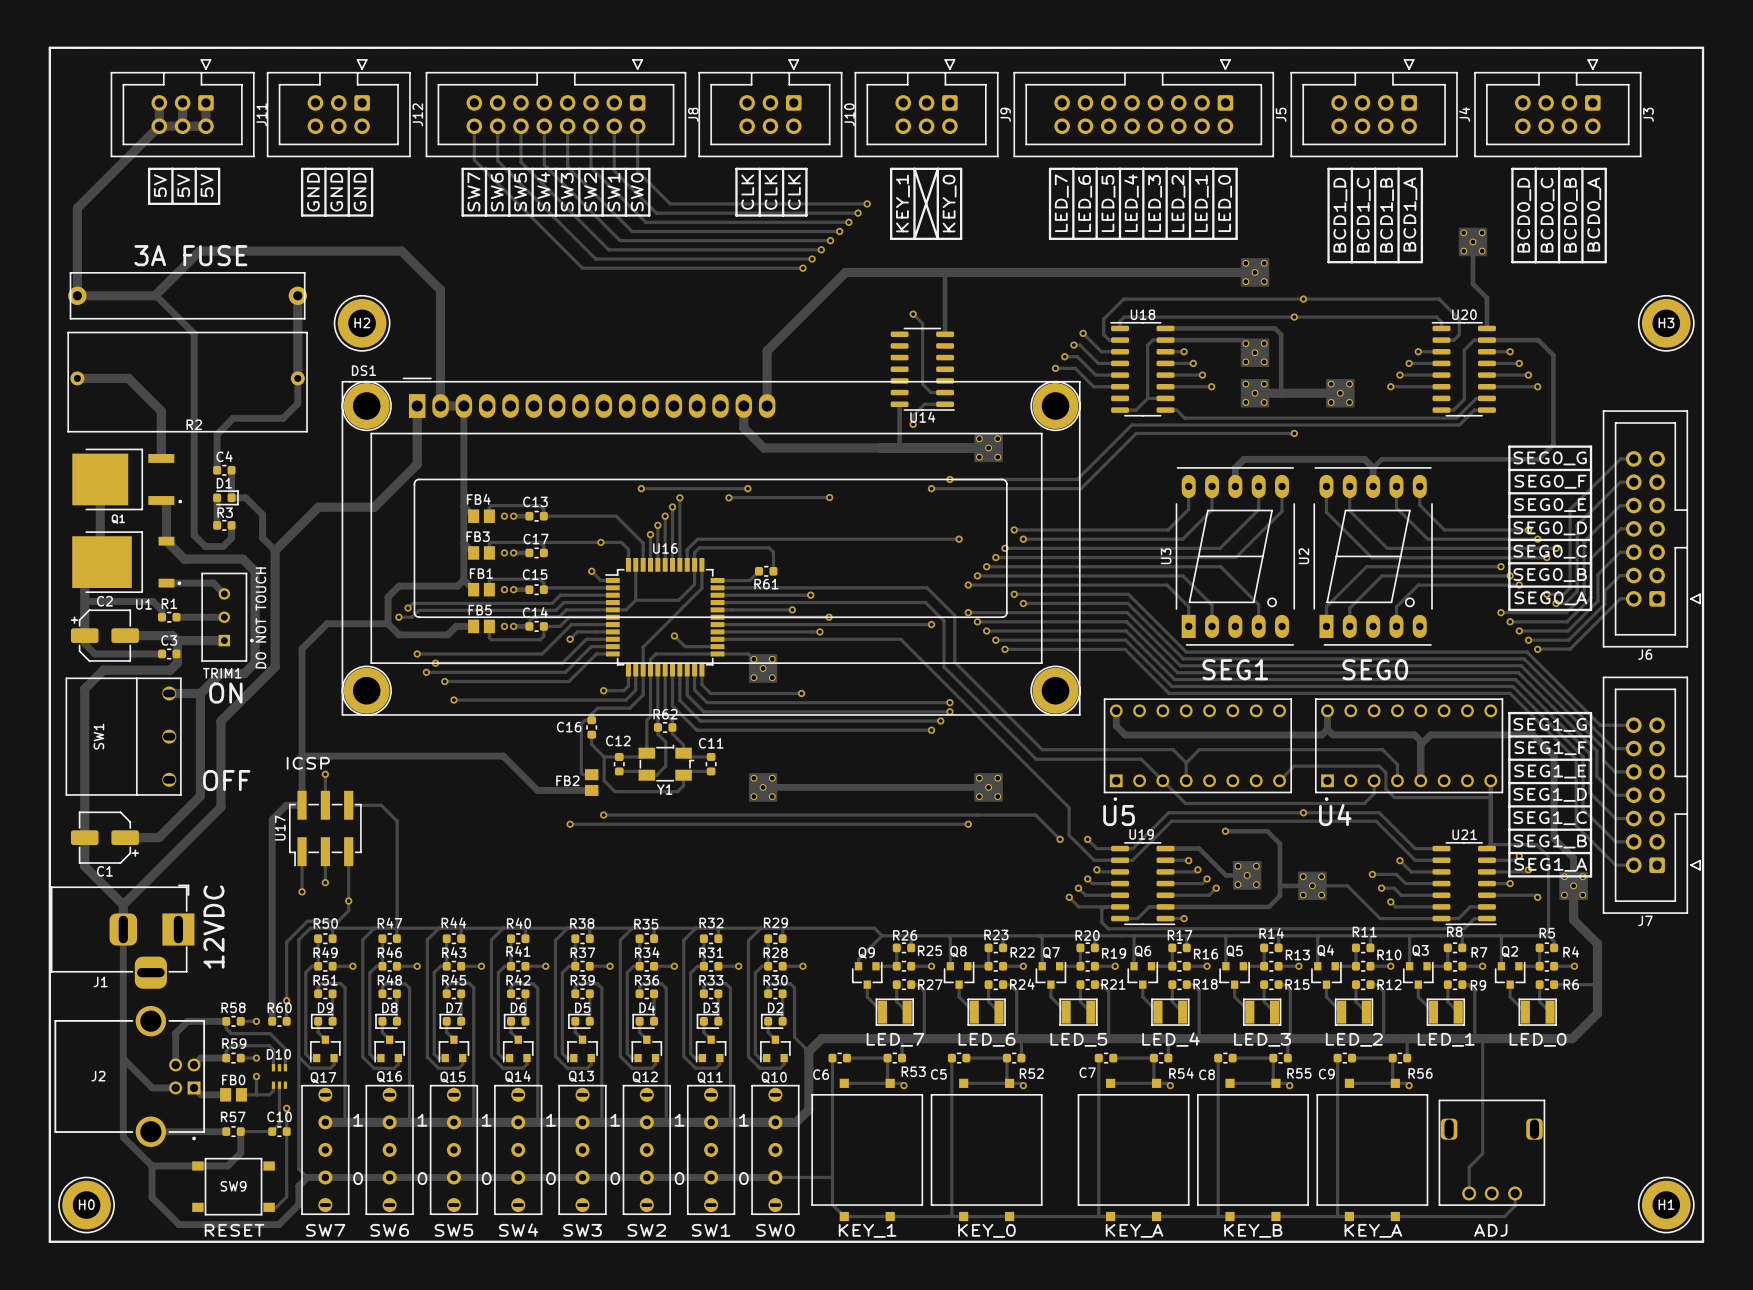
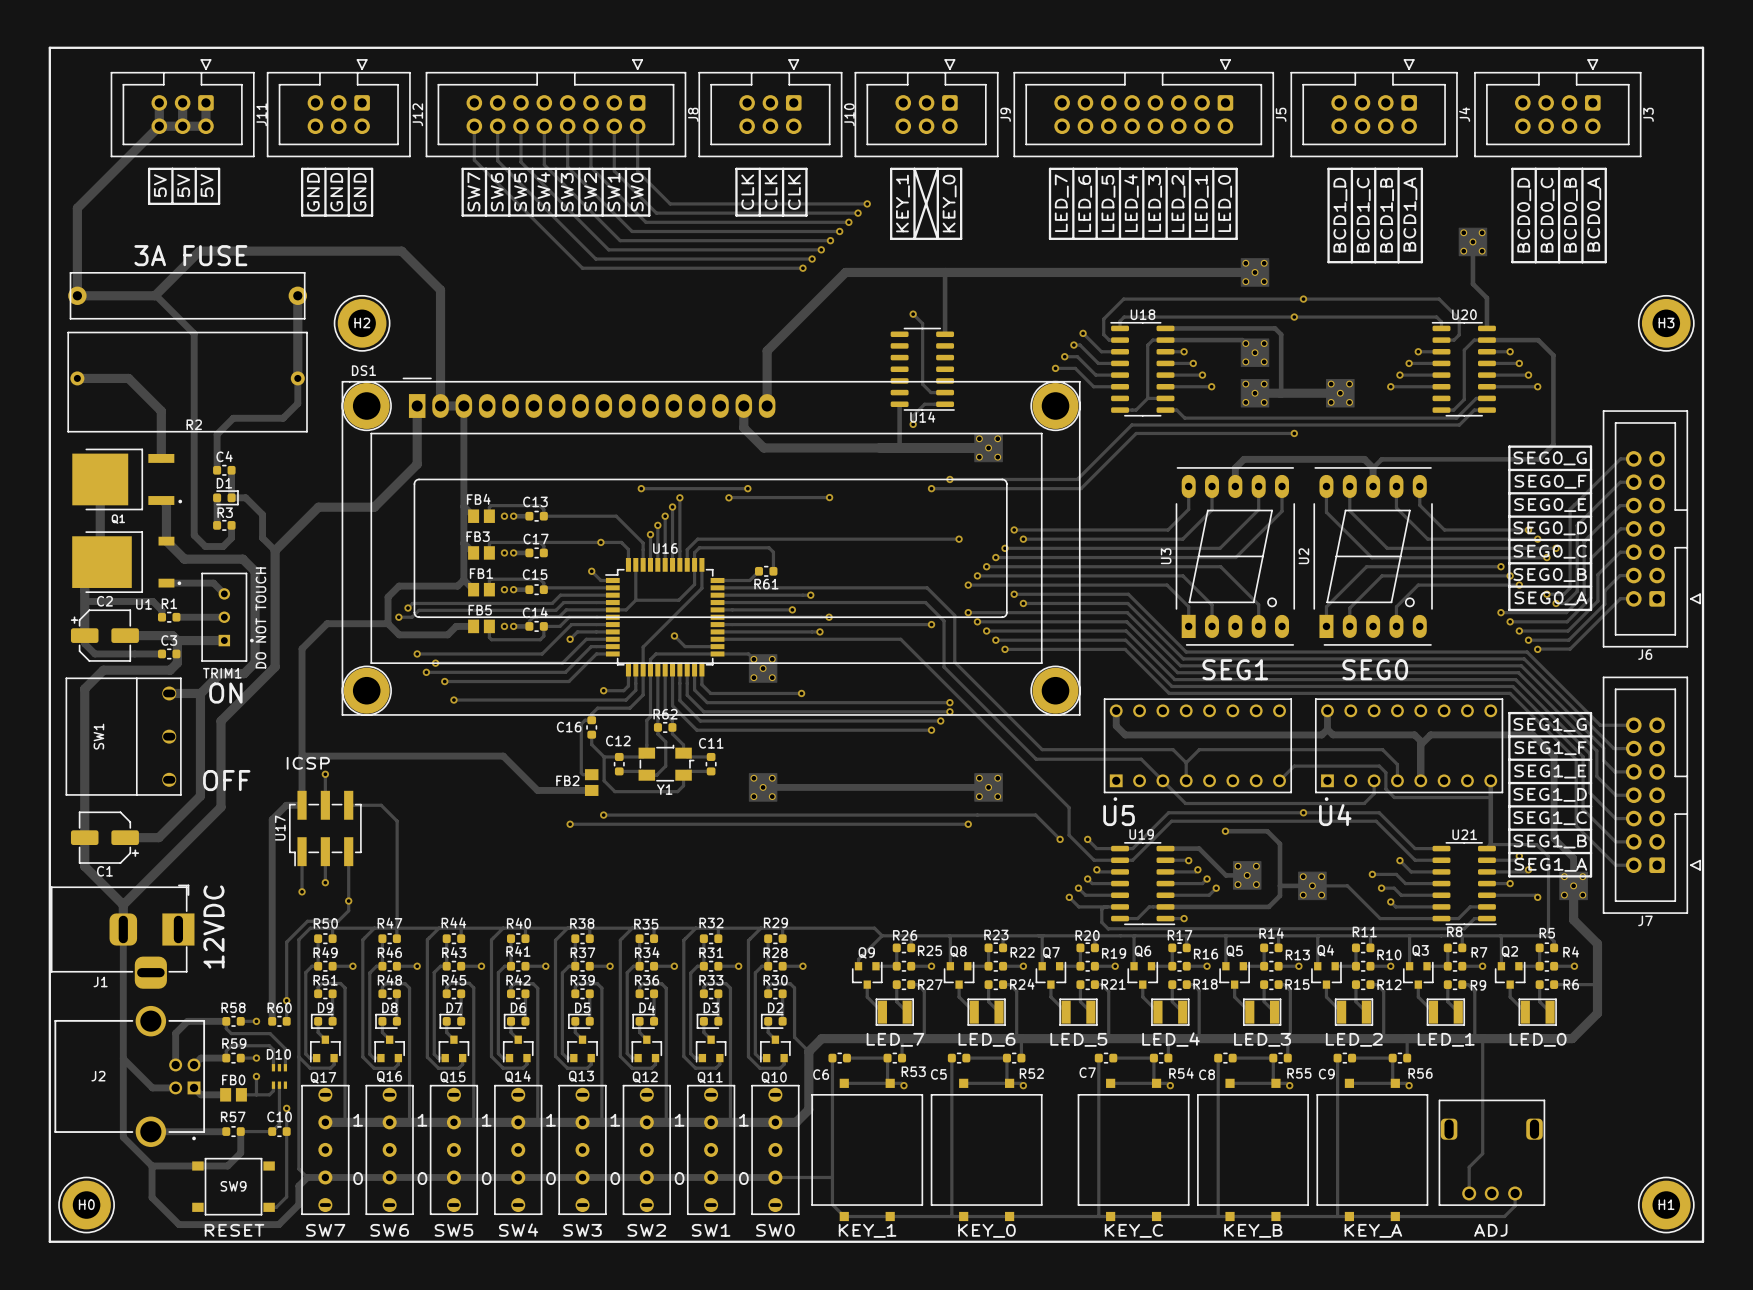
text: KEY_A (1134, 1230) -> KEY_C (1133, 1230)

